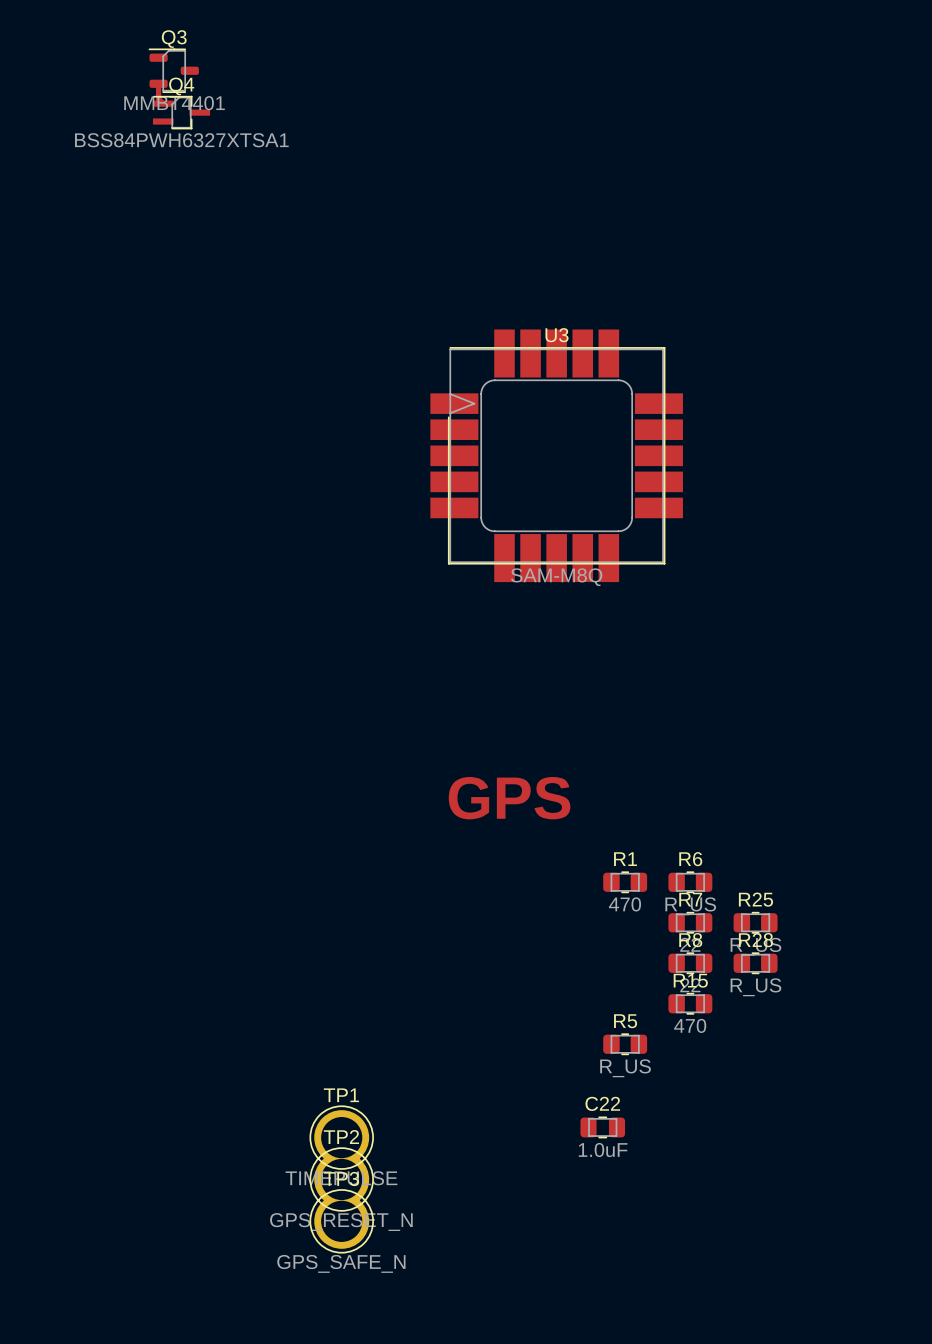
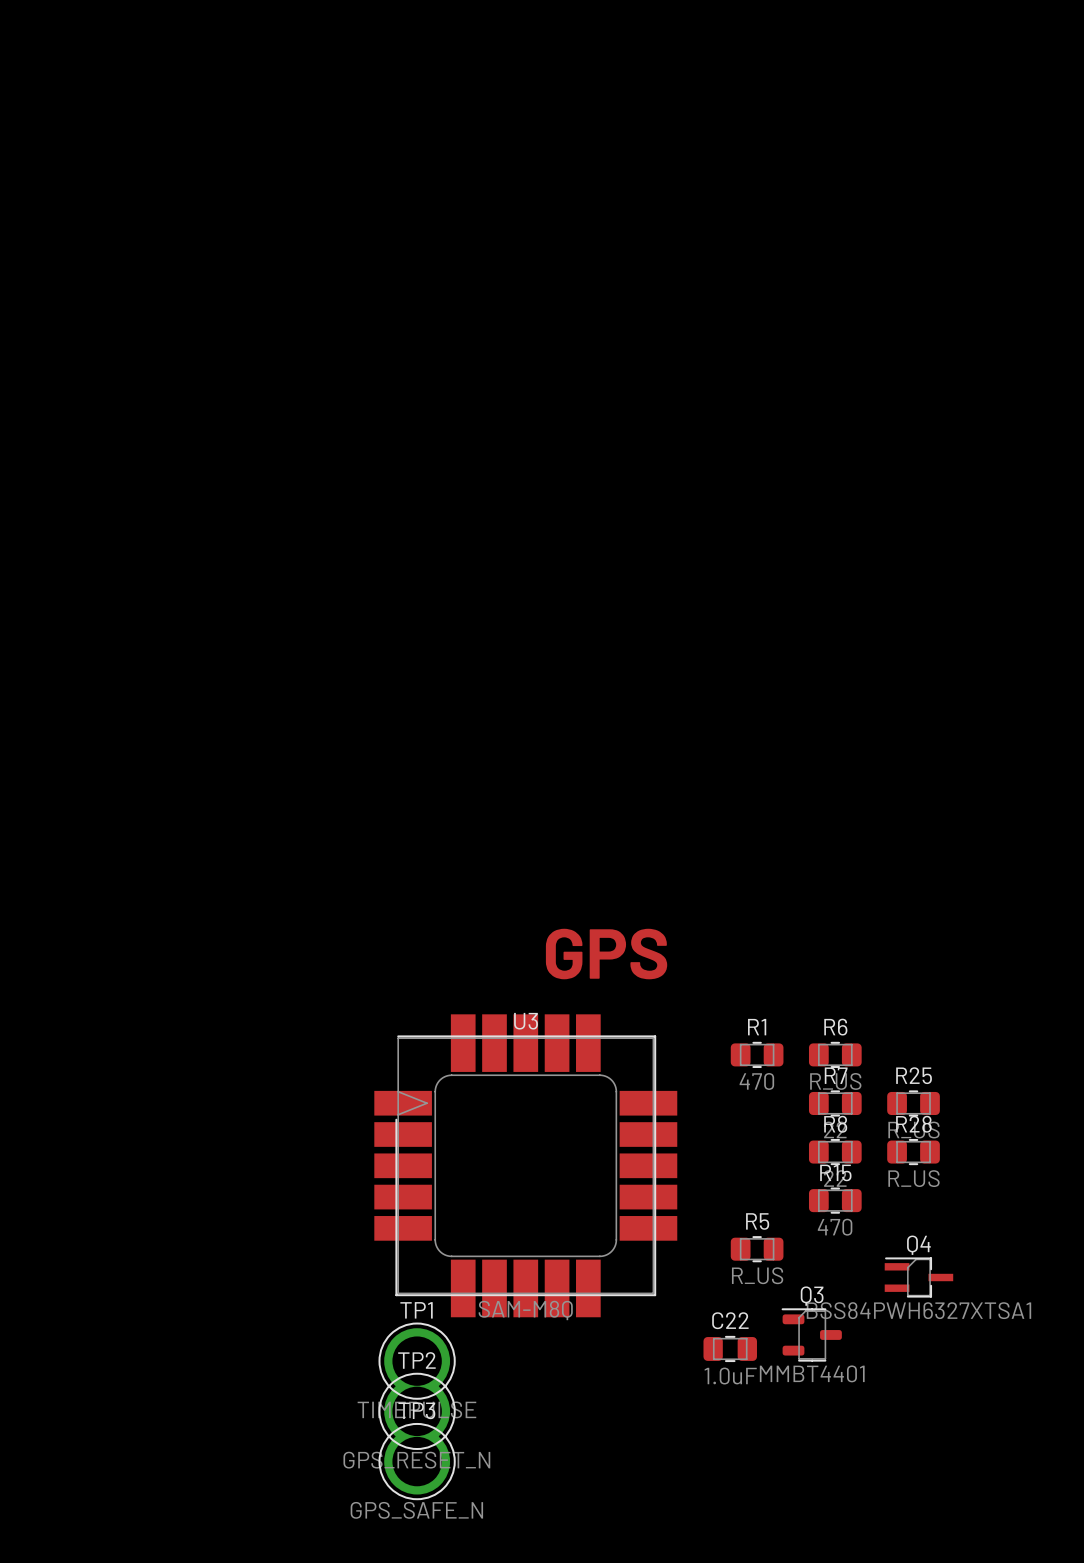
Q3 position: (173, 70) -> (811, 1334)
top track: (158, 83) (158, 99) (163, 103) -> none
Q4 position: (181, 112) -> (918, 1277)
U3 position: (556, 455) -> (525, 1165)

